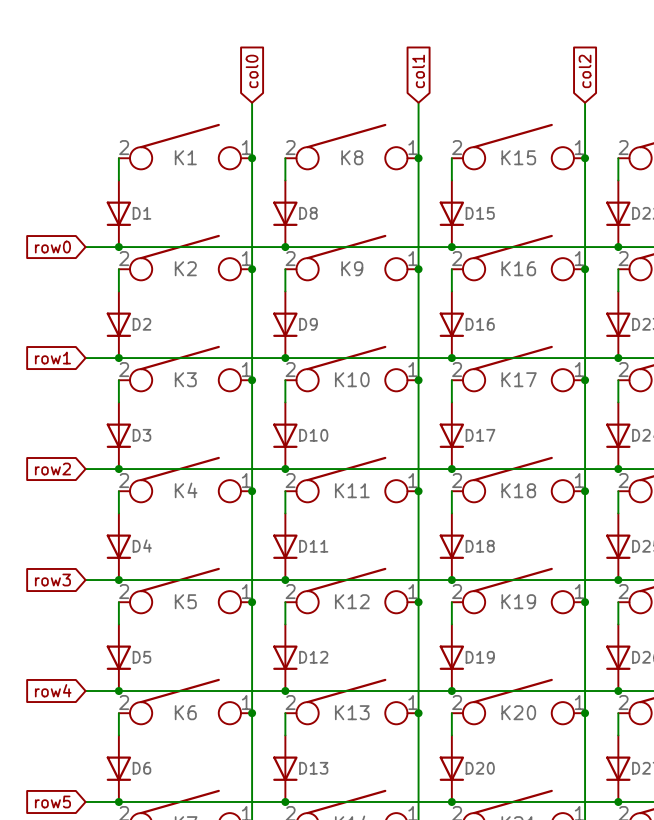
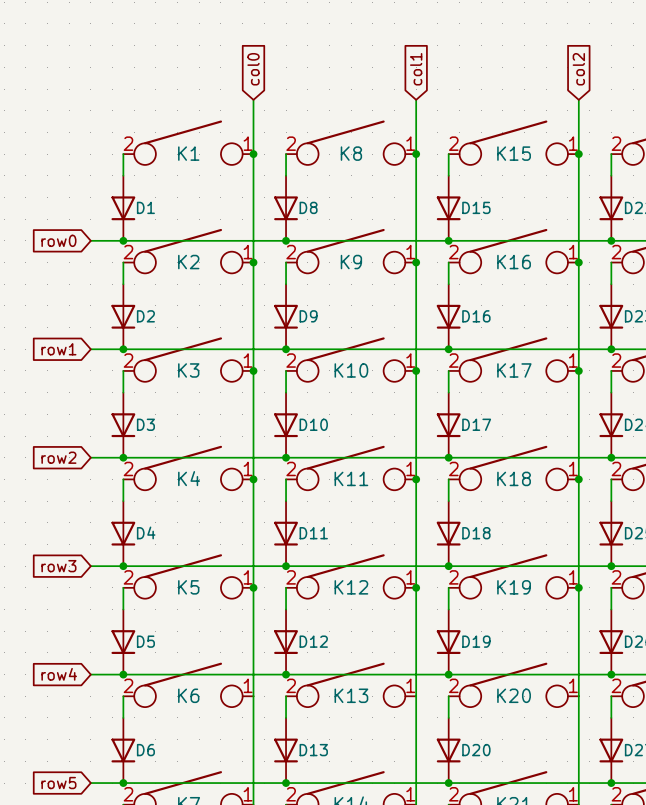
junction: (252, 713) -> none
junction: (418, 713) -> none
junction: (585, 713) -> none

